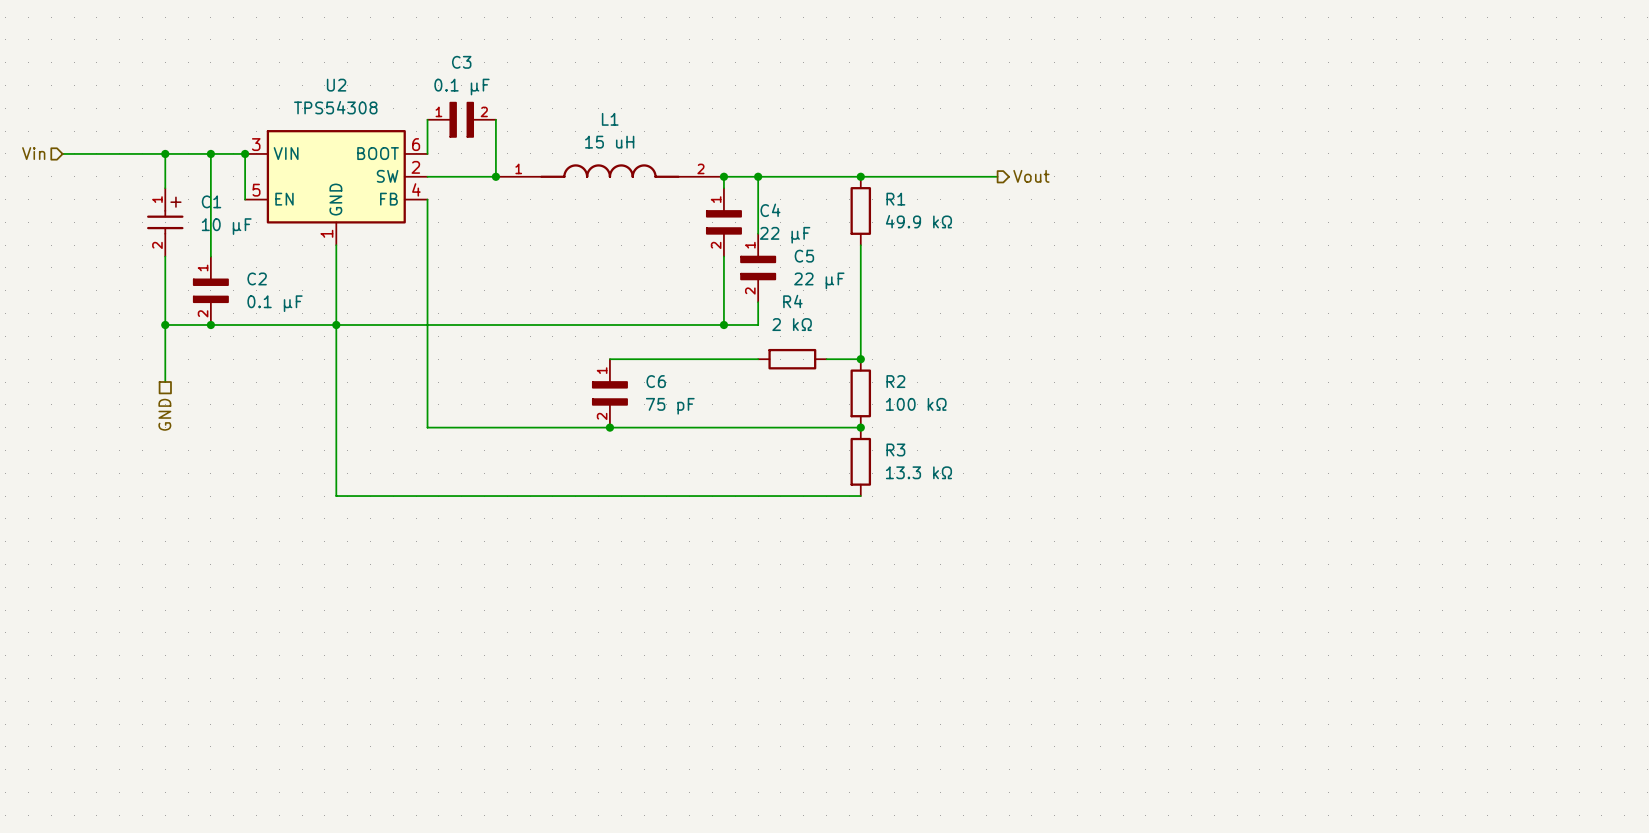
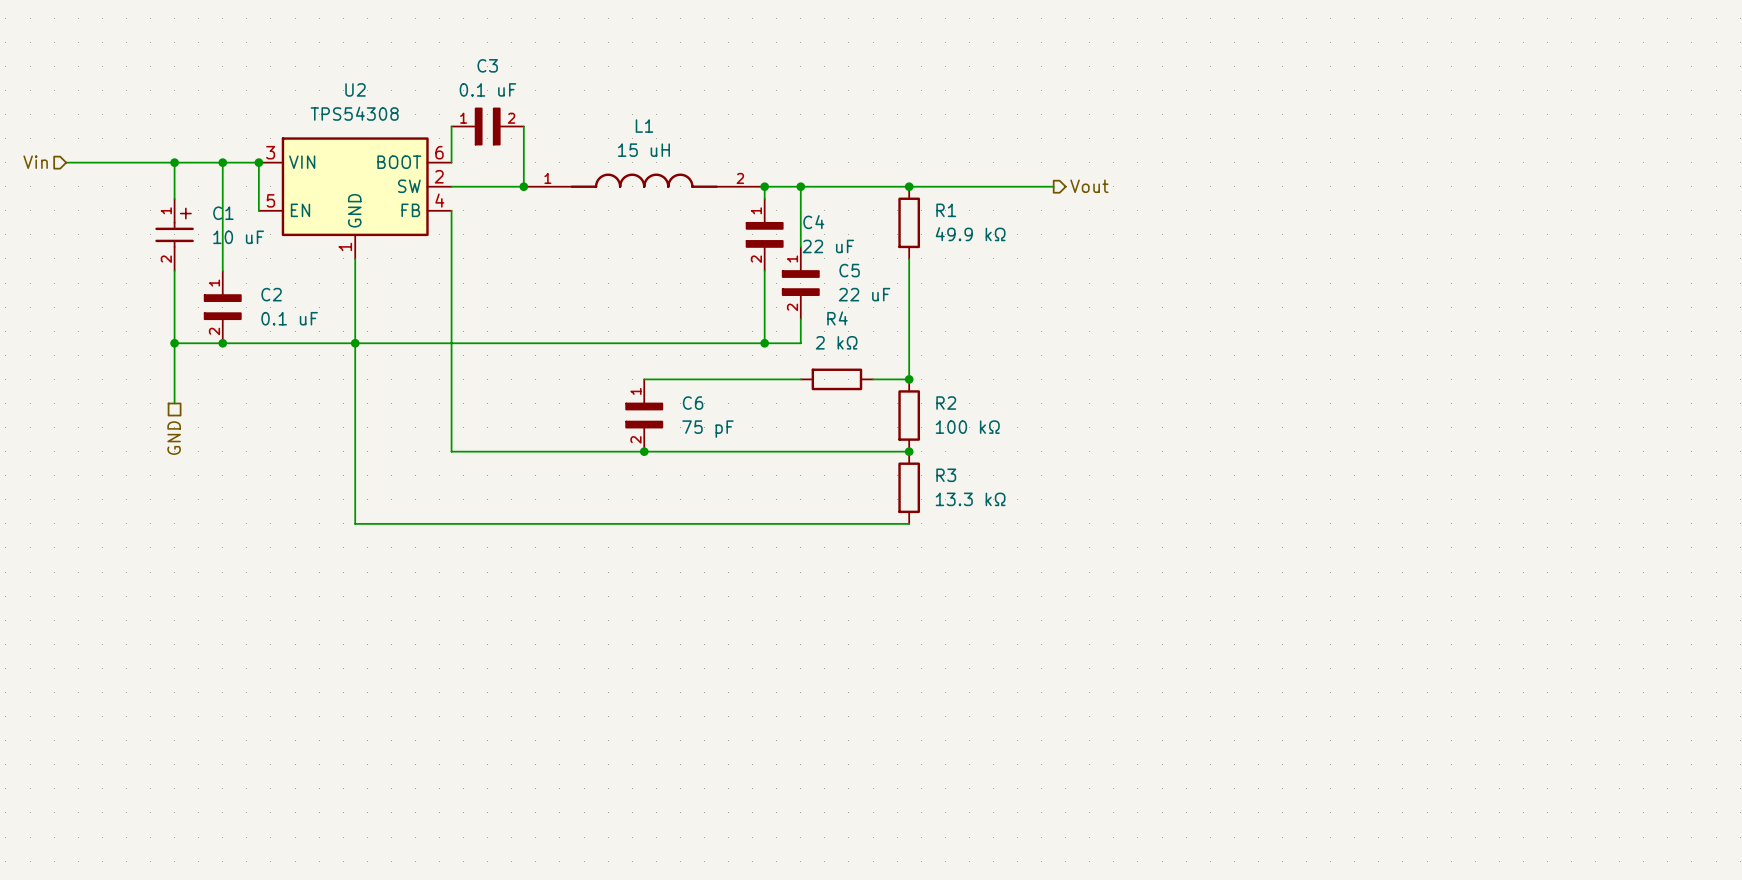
C3 value: 0.1 µF (462, 87) -> 0.1 uF (487, 89)
C1 value: 10 µF (226, 226) -> 10 uF (238, 237)
C4 value: 22 µF (785, 235) -> 22 uF (828, 246)
C5 value: 22 µF (819, 280) -> 22 uF (864, 294)
C2 value: 0.1 µF (275, 303) -> 0.1 uF (289, 318)

